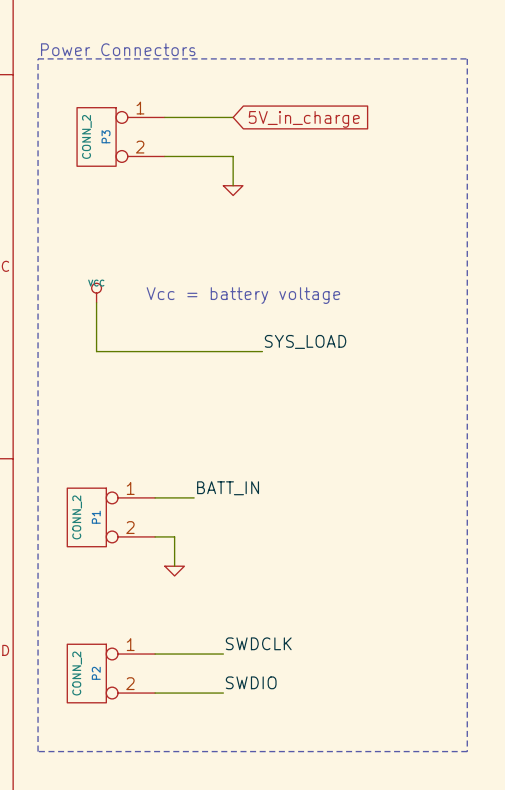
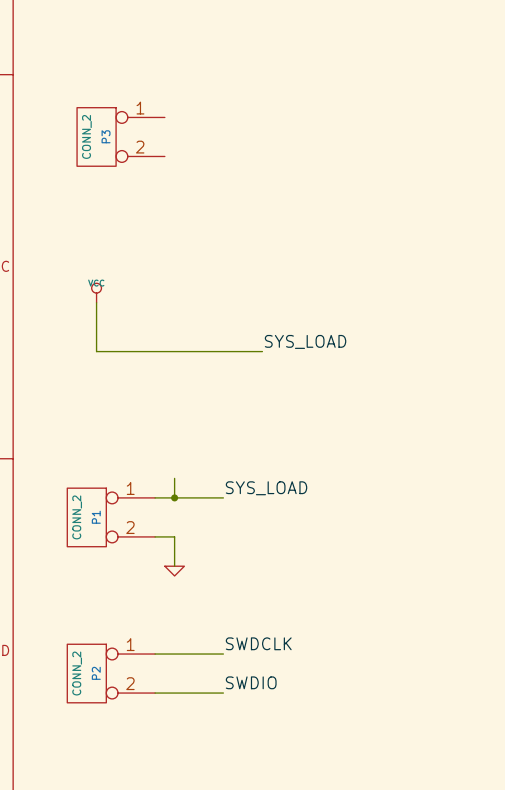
text: Power Connectors (118, 49) -> none
line: (38, 58) (467, 58) (467, 751) (38, 751) (38, 58) -> none
wire: (164, 117) (233, 117) -> none
global label: 5V_in_charge (304, 119) -> none
wire: (164, 156) (233, 156) (233, 185) -> none
power symbol: (233, 190) -> none
text: Vcc = battery voltage (243, 295) -> none
wire: none -> (174, 478) (174, 497)
label: BATT_IN (228, 488) -> none
label: none -> SYS_LOAD (266, 488)
junction: none -> (174, 497)
wire: none -> (194, 497) (223, 497)

